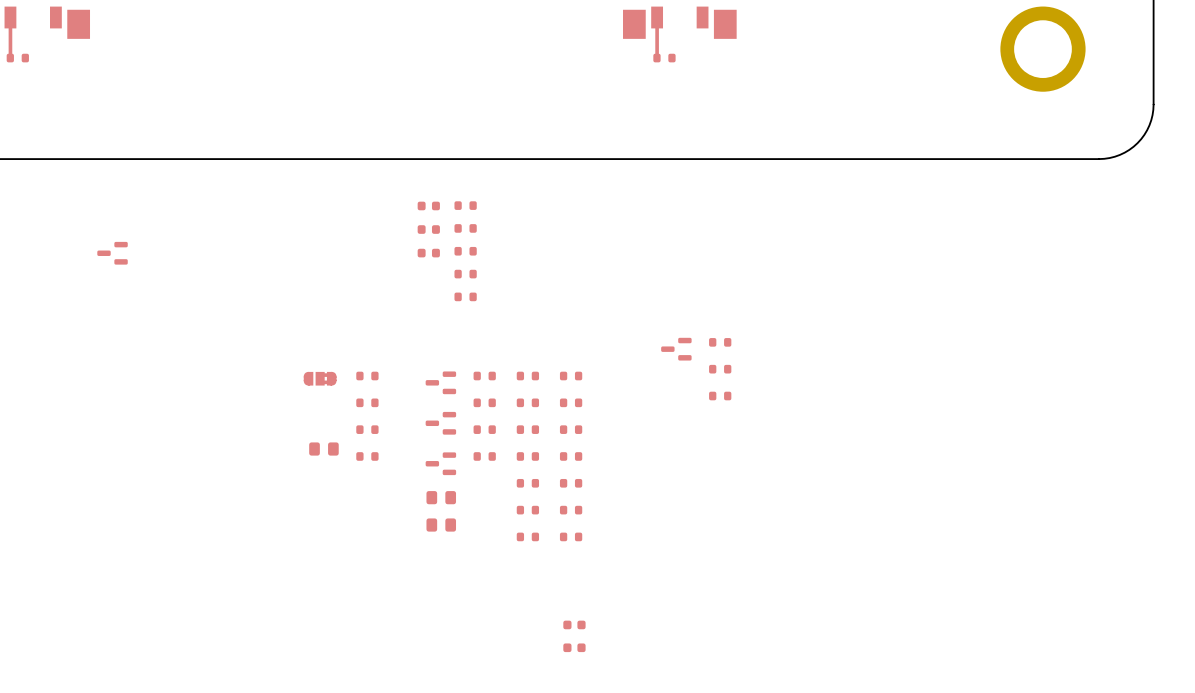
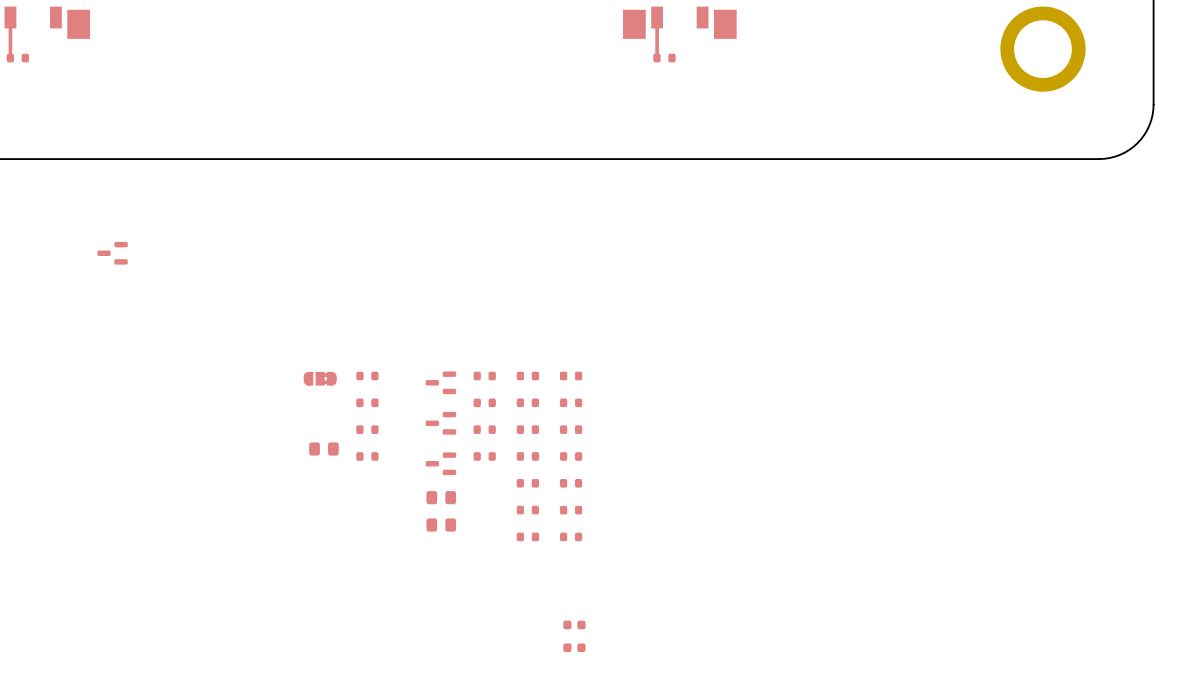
part: (428, 205) -> none
part: (465, 205) -> none
part: (465, 228) -> none
part: (428, 229) -> none
part: (465, 251) -> none
part: (428, 253) -> none
part: (465, 274) -> none
part: (465, 296) -> none
part: (720, 342) -> none
part: (676, 349) -> none
part: (720, 369) -> none
part: (720, 396) -> none

